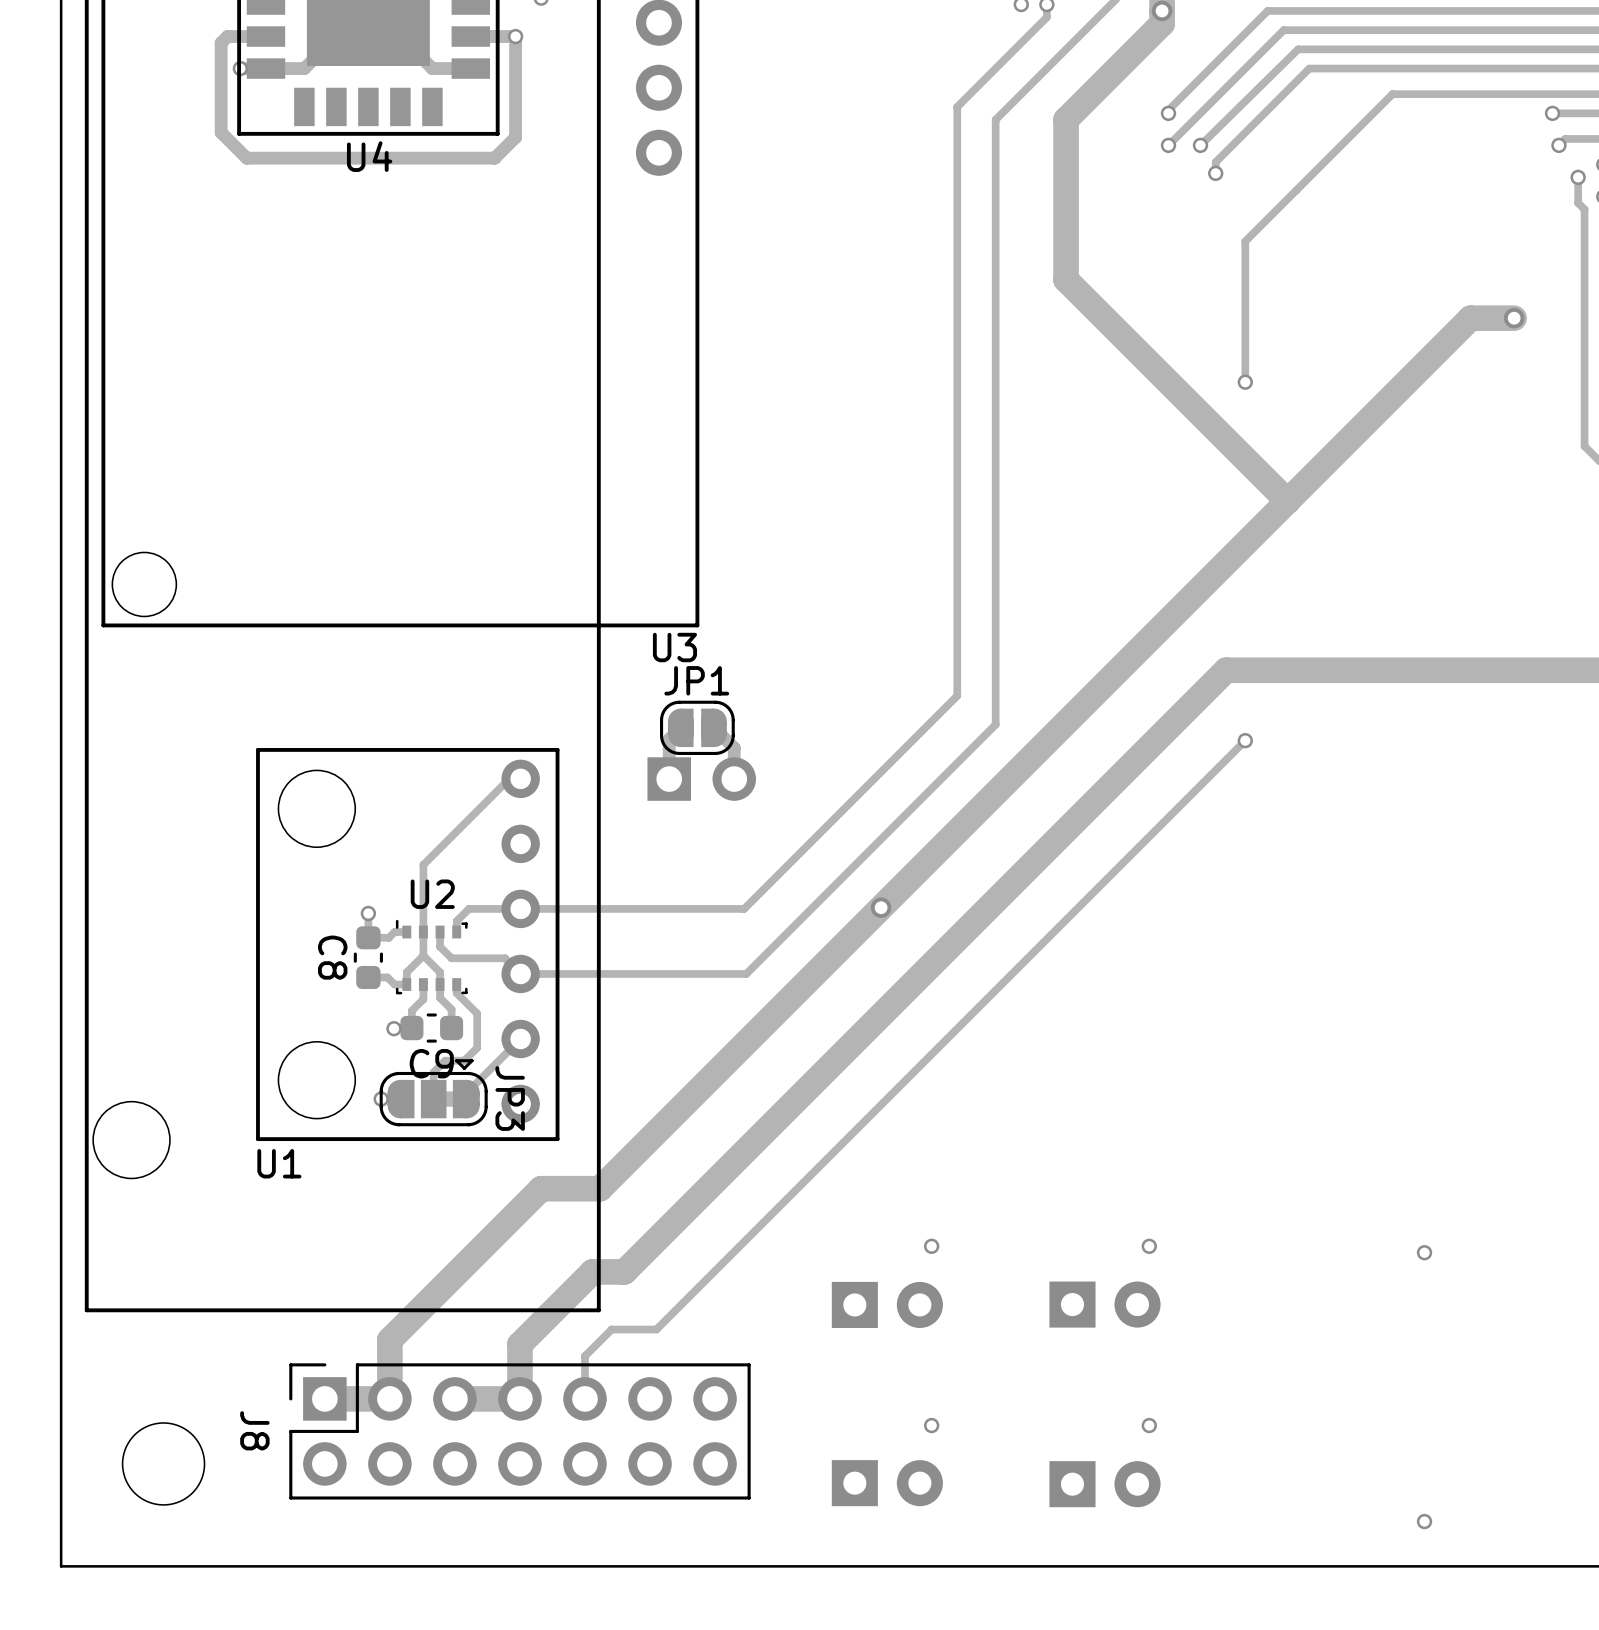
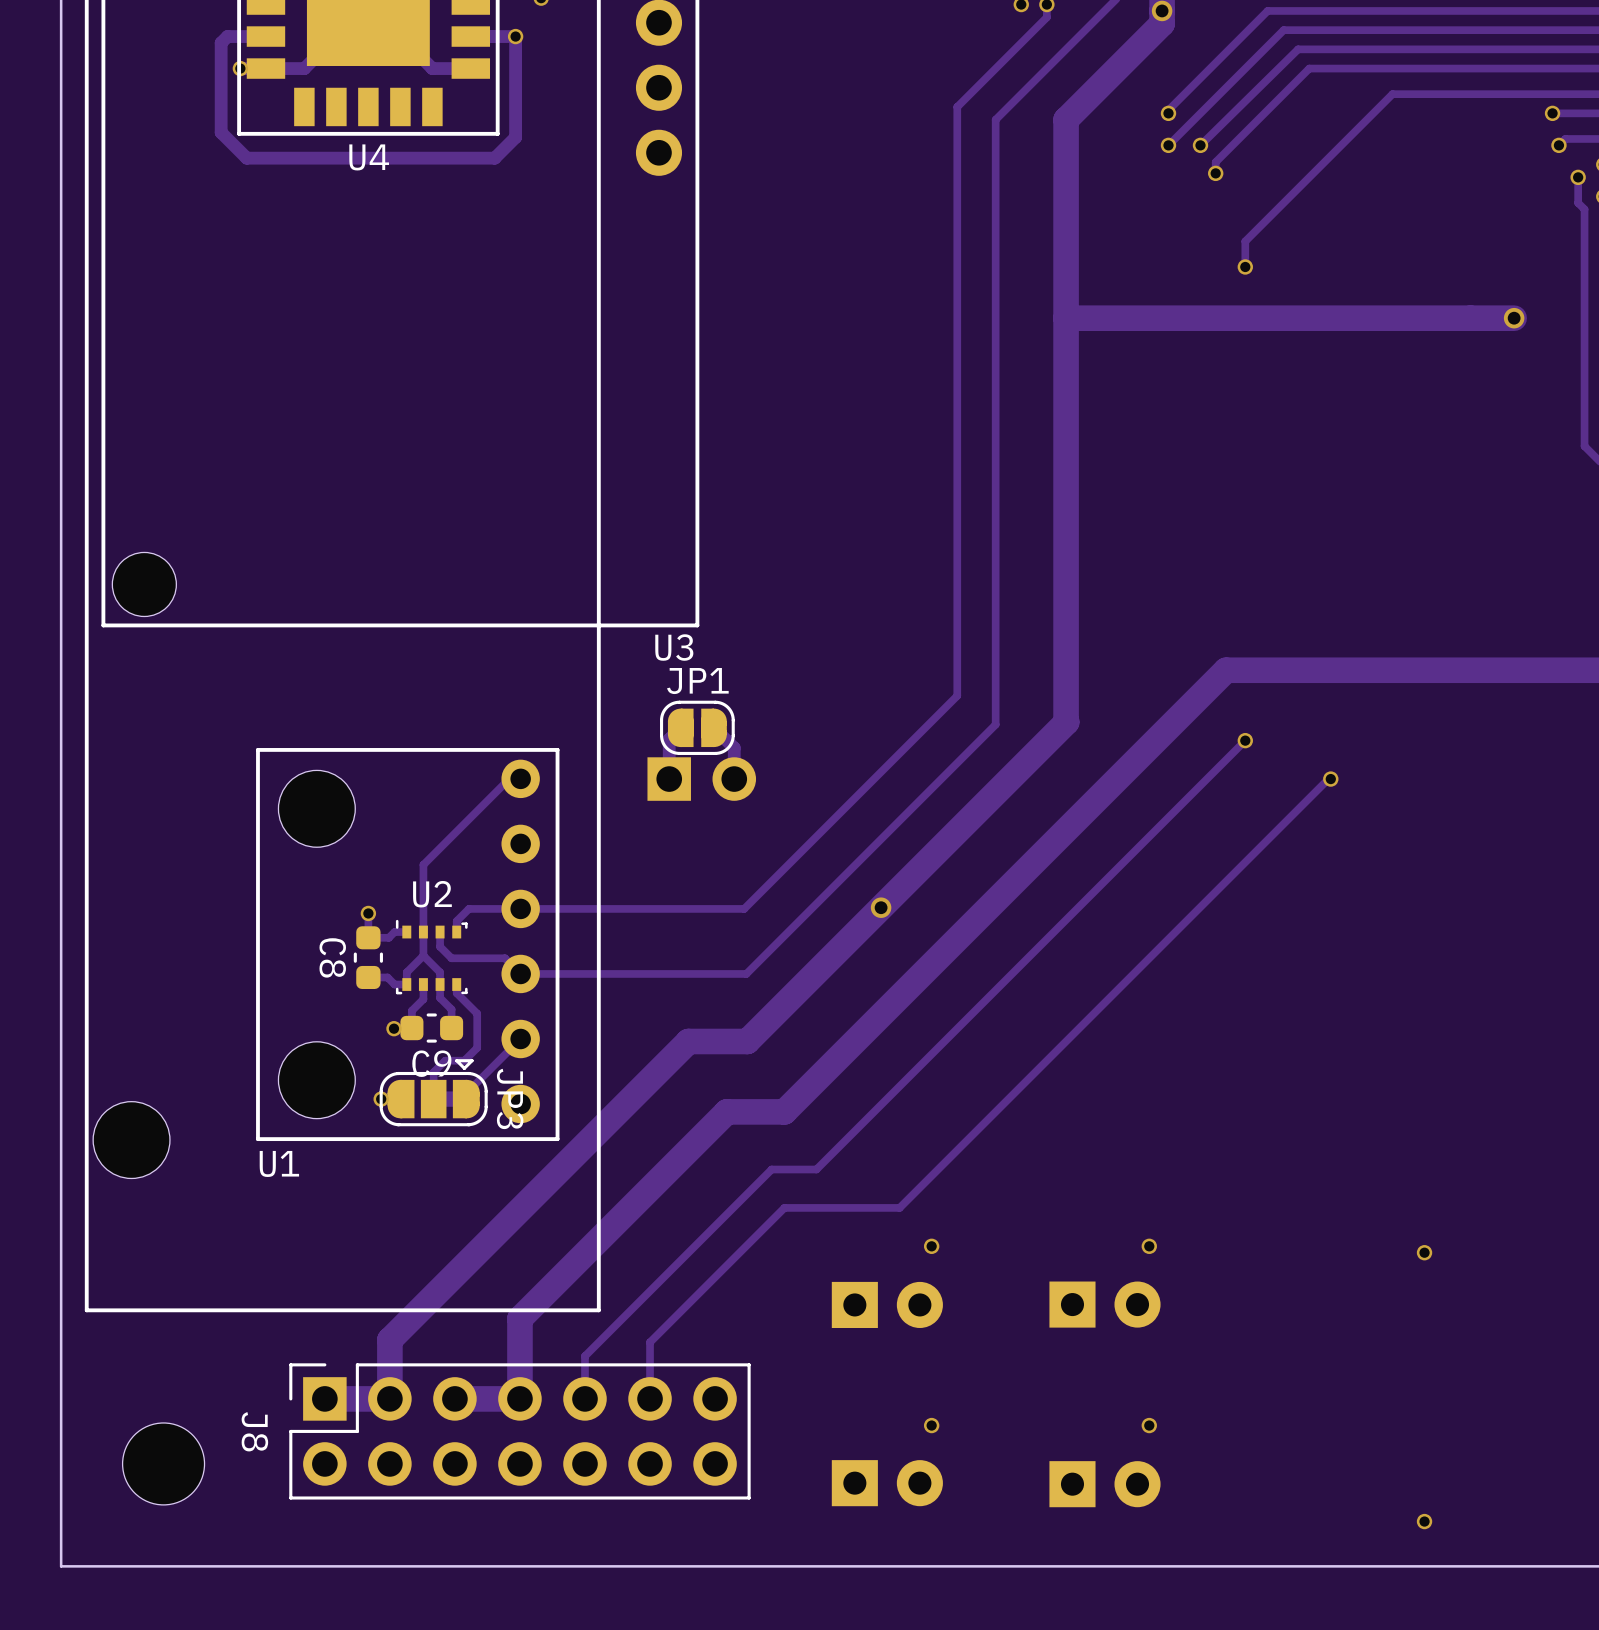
track: (1245, 266) (1245, 382) -> none
track: (1066, 279) (1287, 501) -> (1066, 279) (1066, 722)
track: (1470, 318) (1066, 722) -> (1470, 318) (1066, 318)
via position: (1245, 382) -> (1245, 266)
track: none -> (1330, 779) (1328, 779) (899, 1207) (784, 1207) (650, 1342) (650, 1398)
via: none -> (1330, 779)
track: (747, 1041) (600, 1188) (541, 1188) -> (747, 1041) (688, 1041) (541, 1188)
track: (784, 1111) (624, 1271) (592, 1271) (519, 1344) -> (784, 1111) (726, 1111) (519, 1318) (519, 1344)
track: (816, 1169) (656, 1329) (611, 1329) -> (816, 1169) (771, 1169) (611, 1329)

